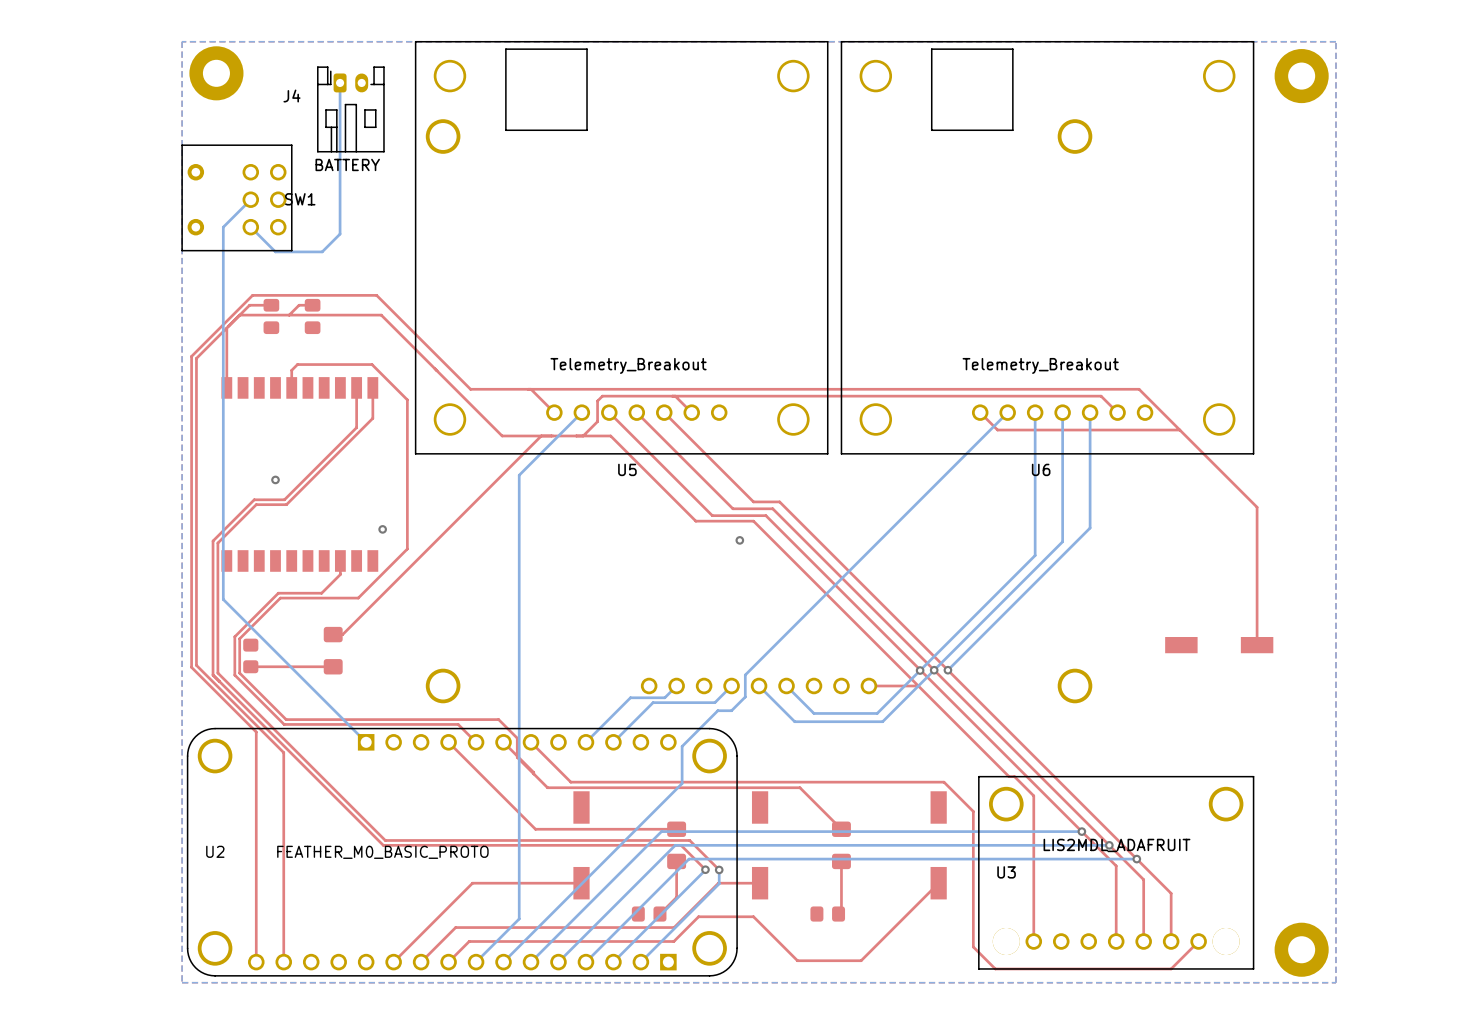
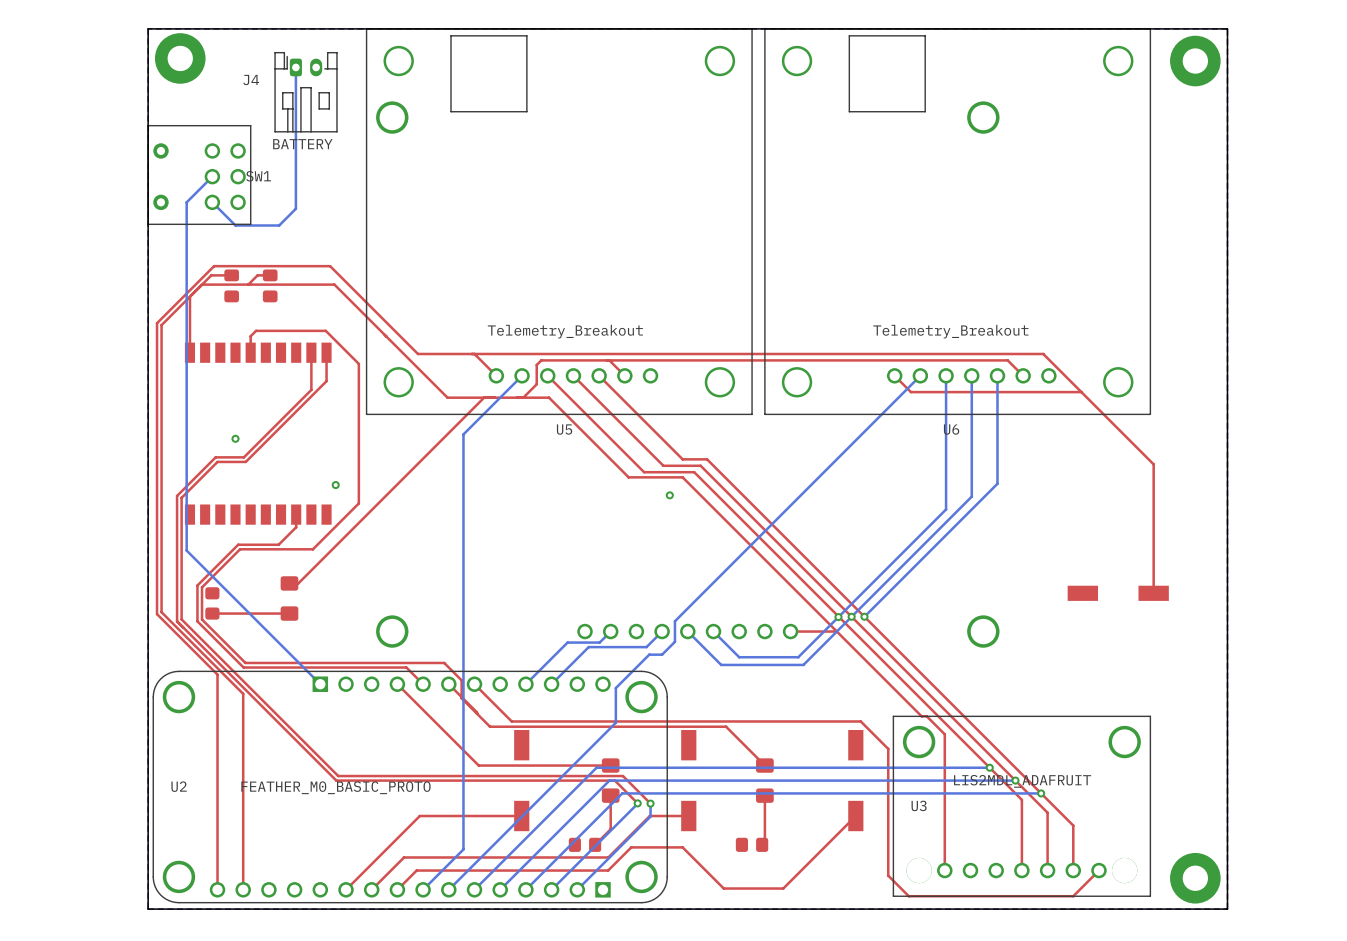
board edge: none -> (1227, 28) (1227, 909) (148, 909) (148, 28) (1227, 28)

